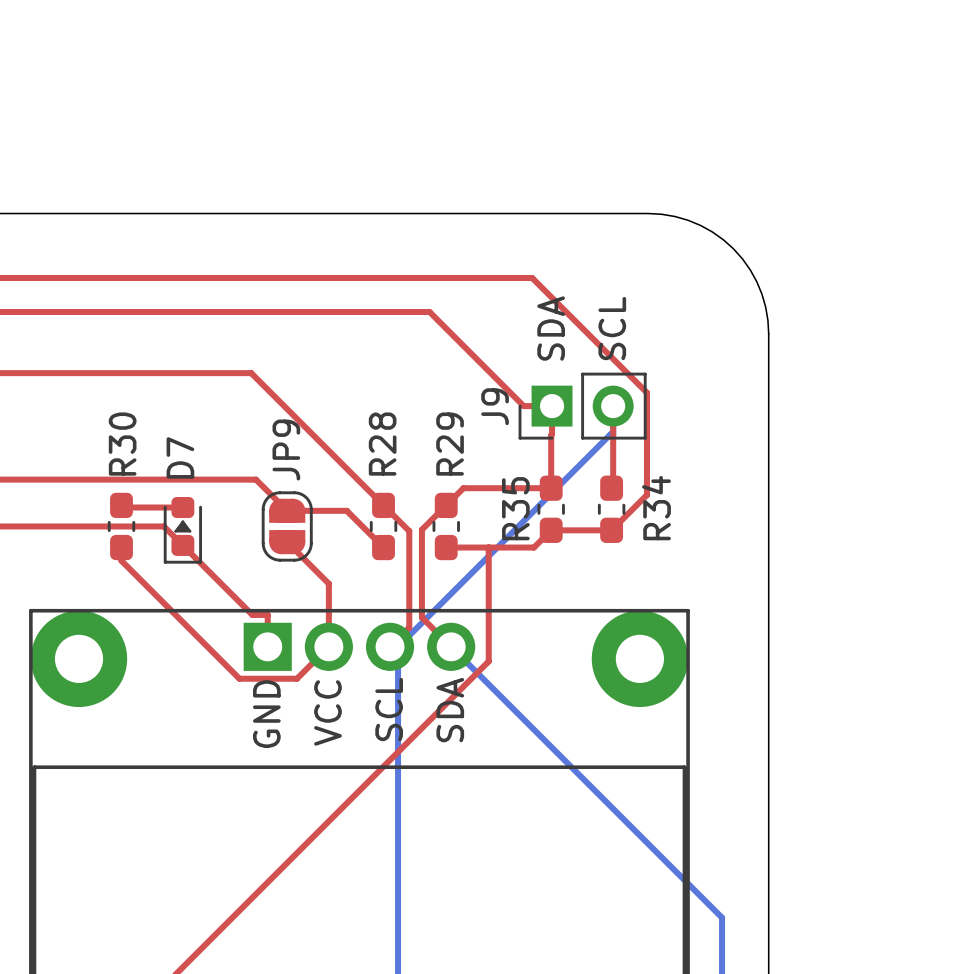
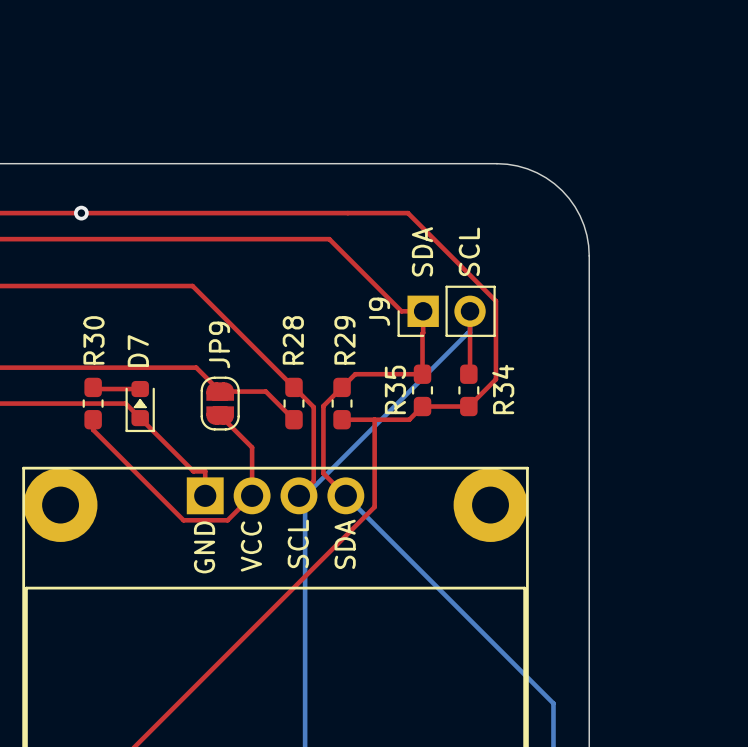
via: none -> (81, 213)

